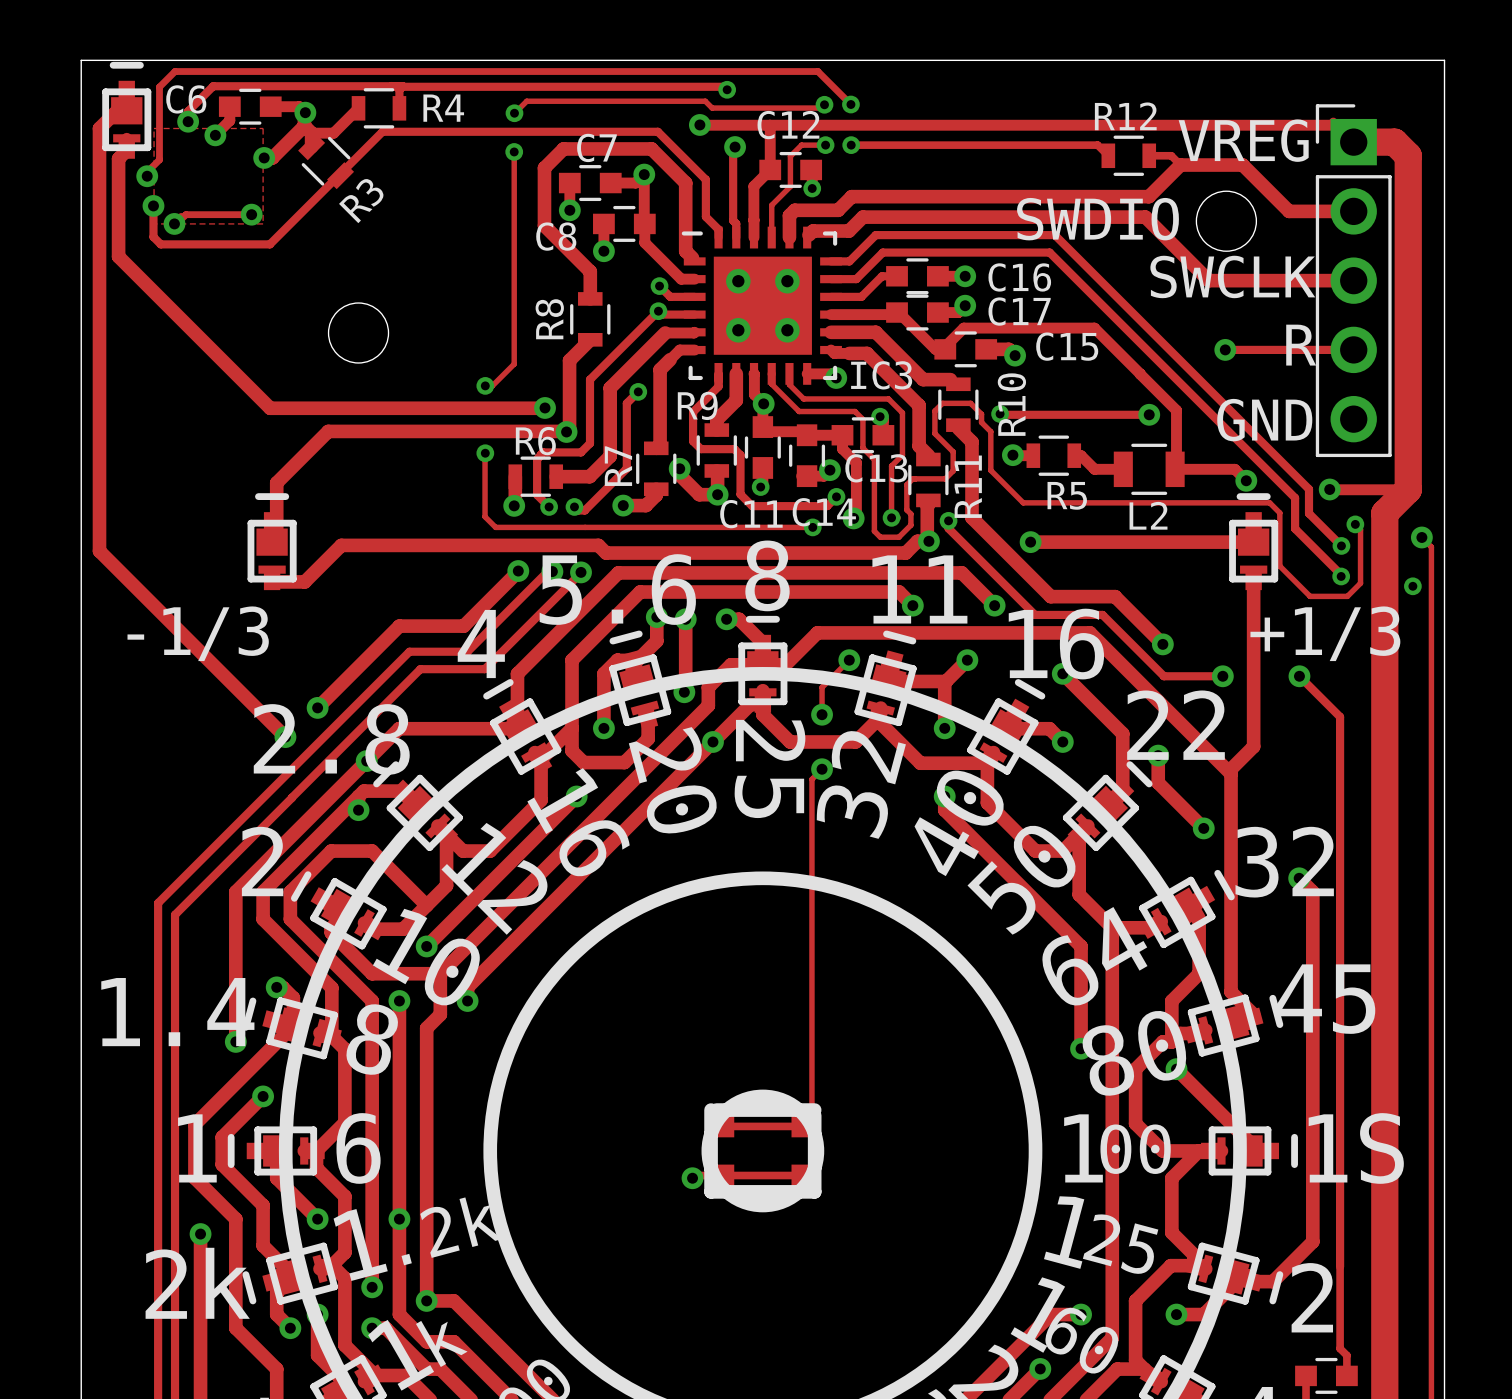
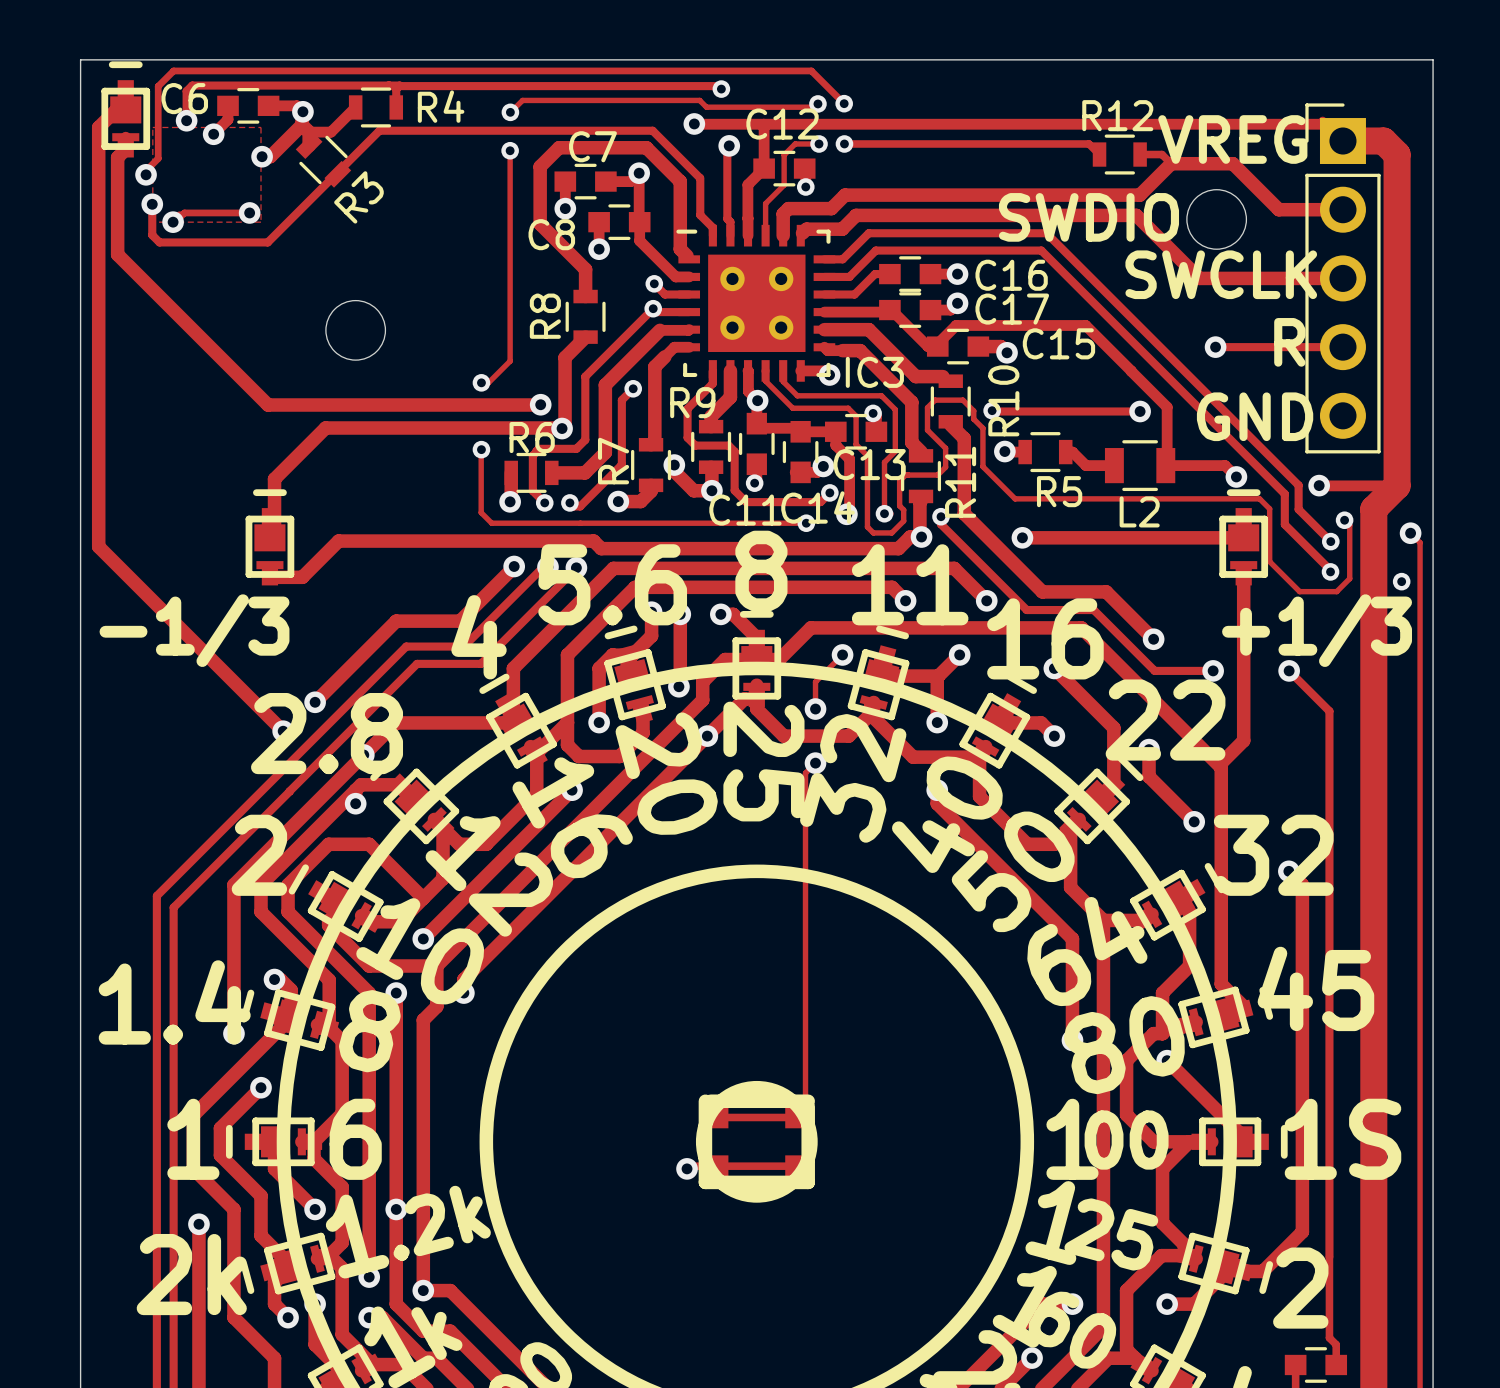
track: (213, 86) (188, 111) -> (211, 85) (192, 85) (186, 91) (186, 110)

